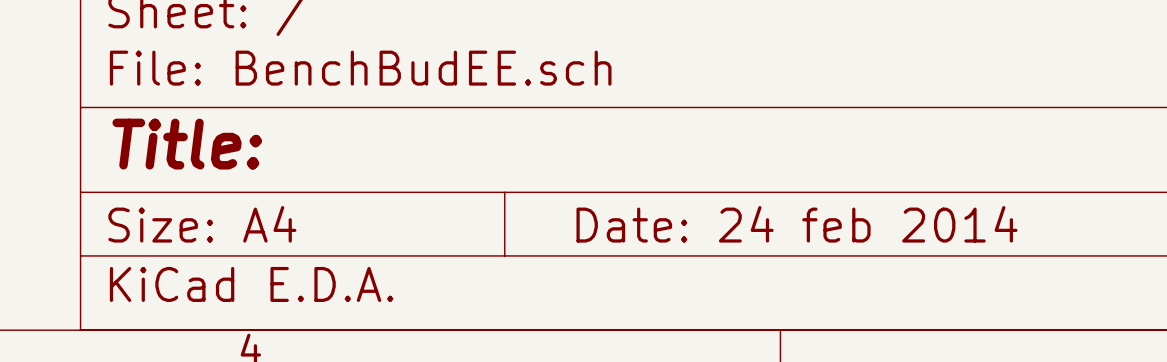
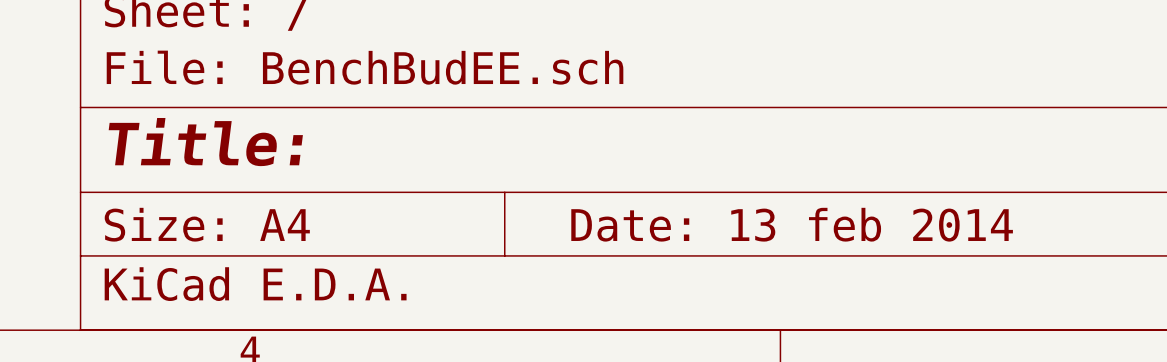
title block: Date: 24 feb 2014 (797, 224) -> Date: 13 feb 2014 (792, 224)

